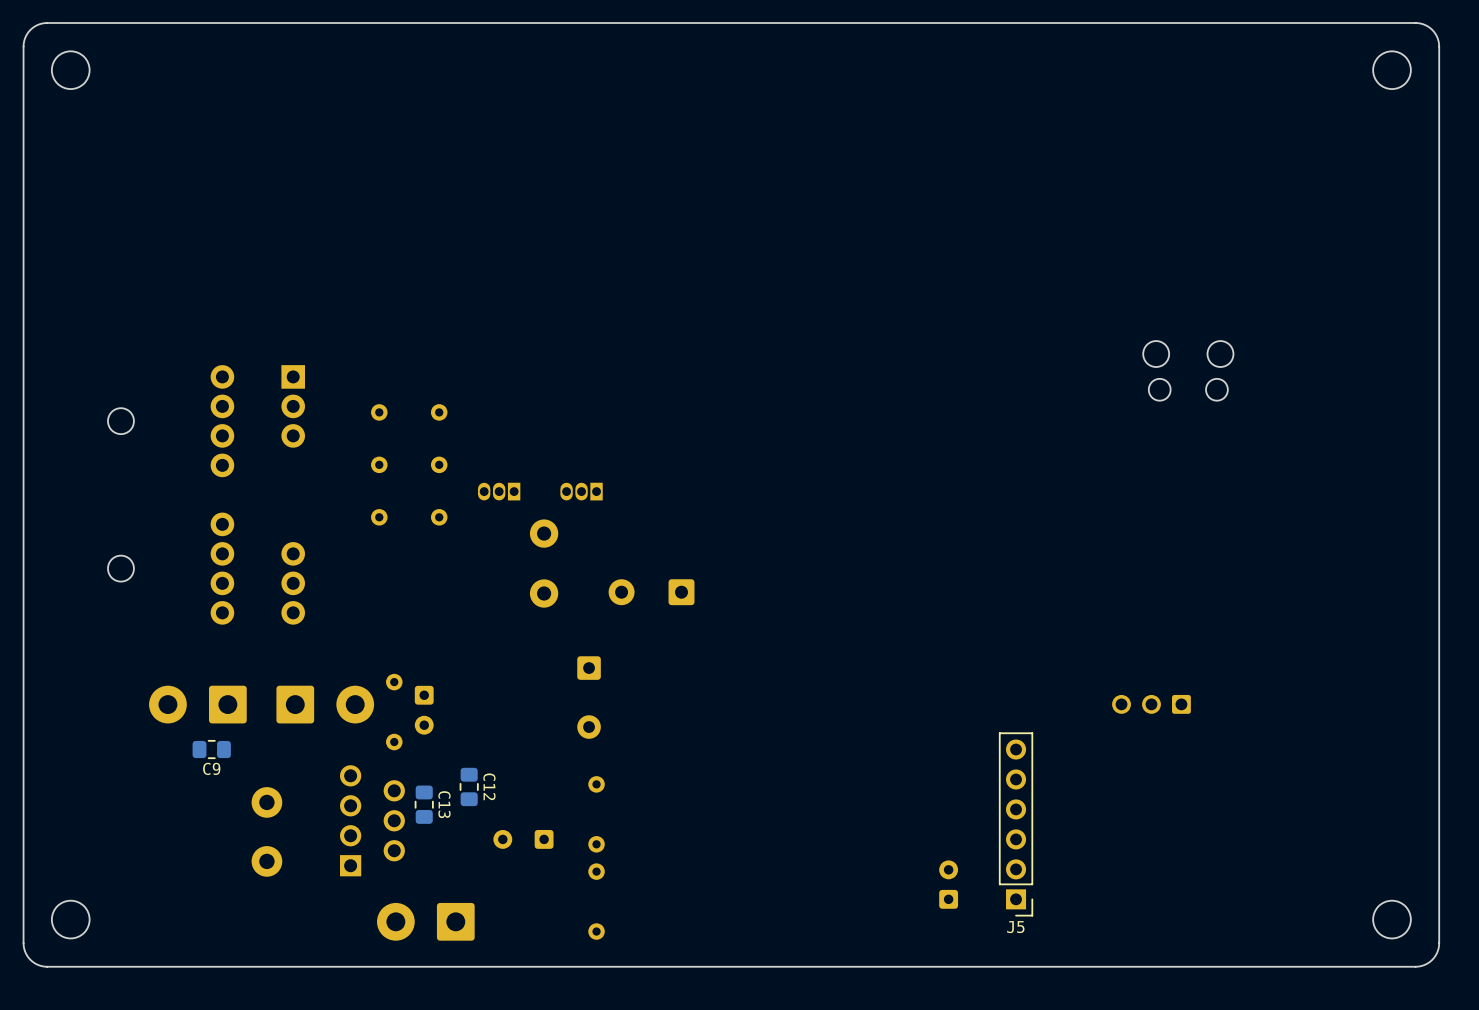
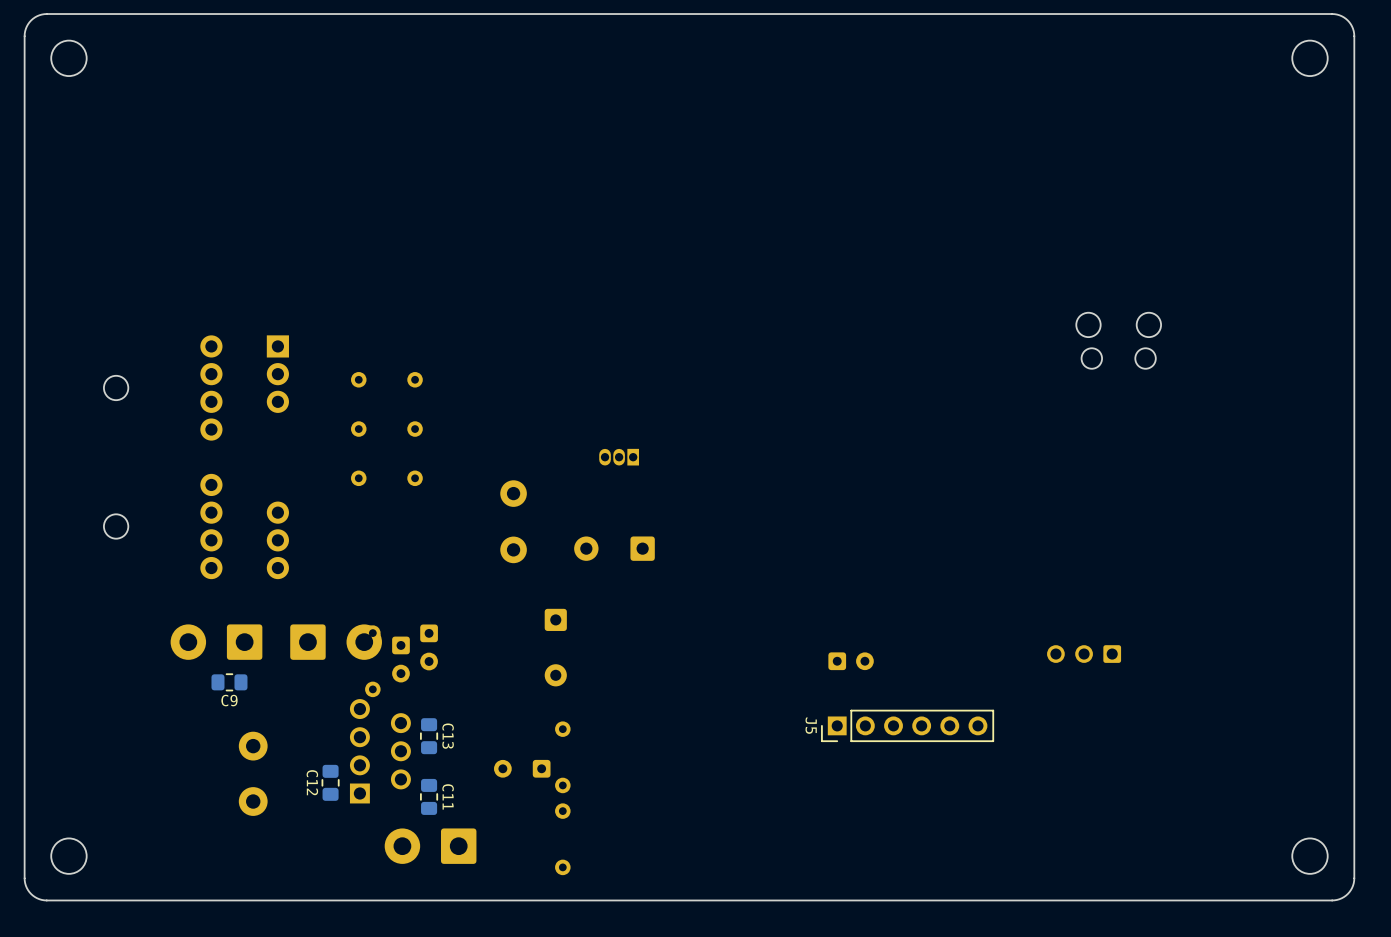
part: (499, 491) -> none
part position: (581, 491) -> (619, 457)
part: none -> (429, 647)
part position: (197, 704) -> (216, 642)
part position: (325, 704) -> (336, 642)
C9 position: (211, 749) -> (229, 682)
C12 position: (469, 786) -> (330, 782)
C12 name position: C12 (489, 786) -> C12 (312, 782)
C13 position: (424, 804) -> (429, 736)
part position: (372, 820) -> (380, 751)
J5 rotation: 0° (1016, 824) -> 90° clockwise (907, 725)
part position: (523, 839) -> (522, 768)
C11: none -> (429, 796)
part rotation: 0° (948, 884) -> 90° clockwise (851, 661)
part position: (948, 884) -> (851, 661)
part position: (425, 921) -> (430, 846)

